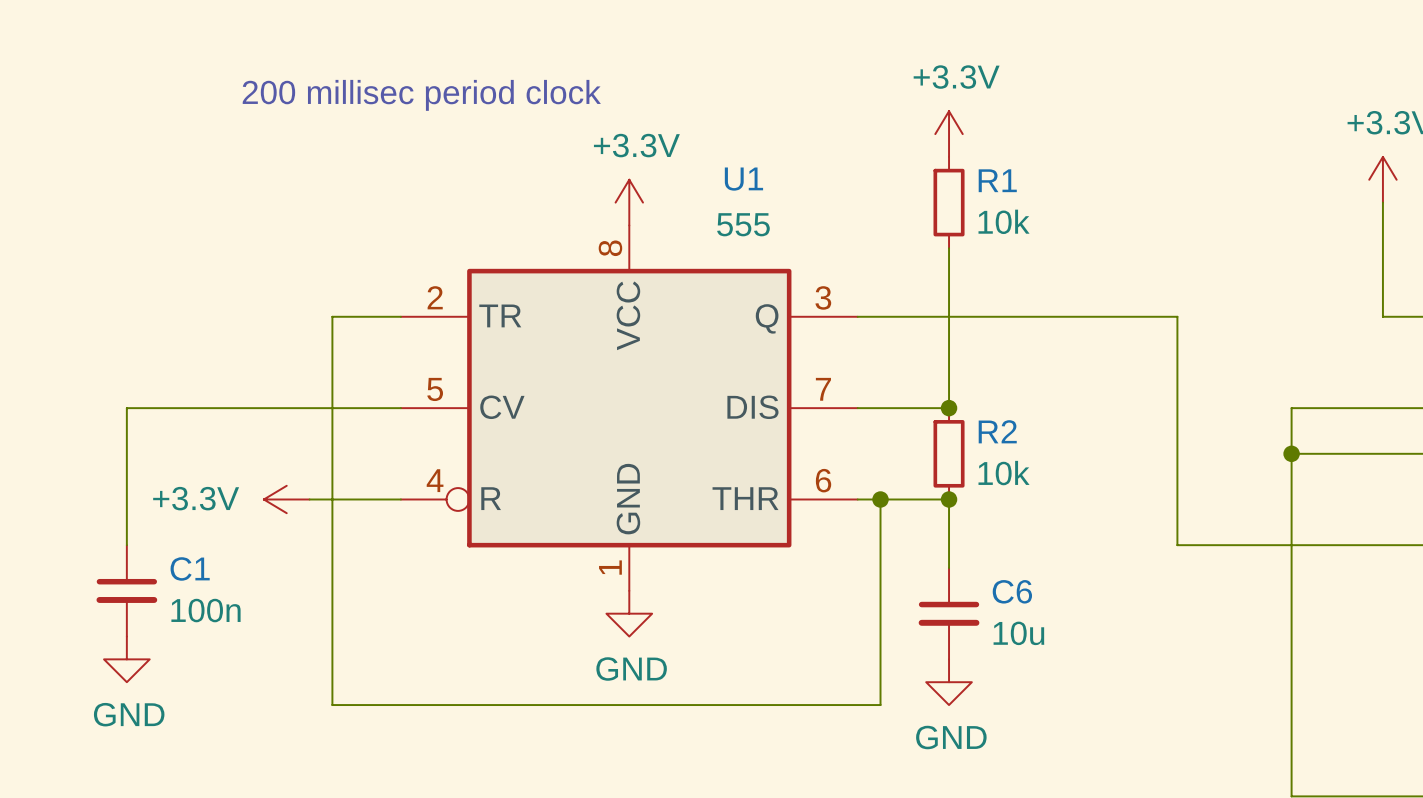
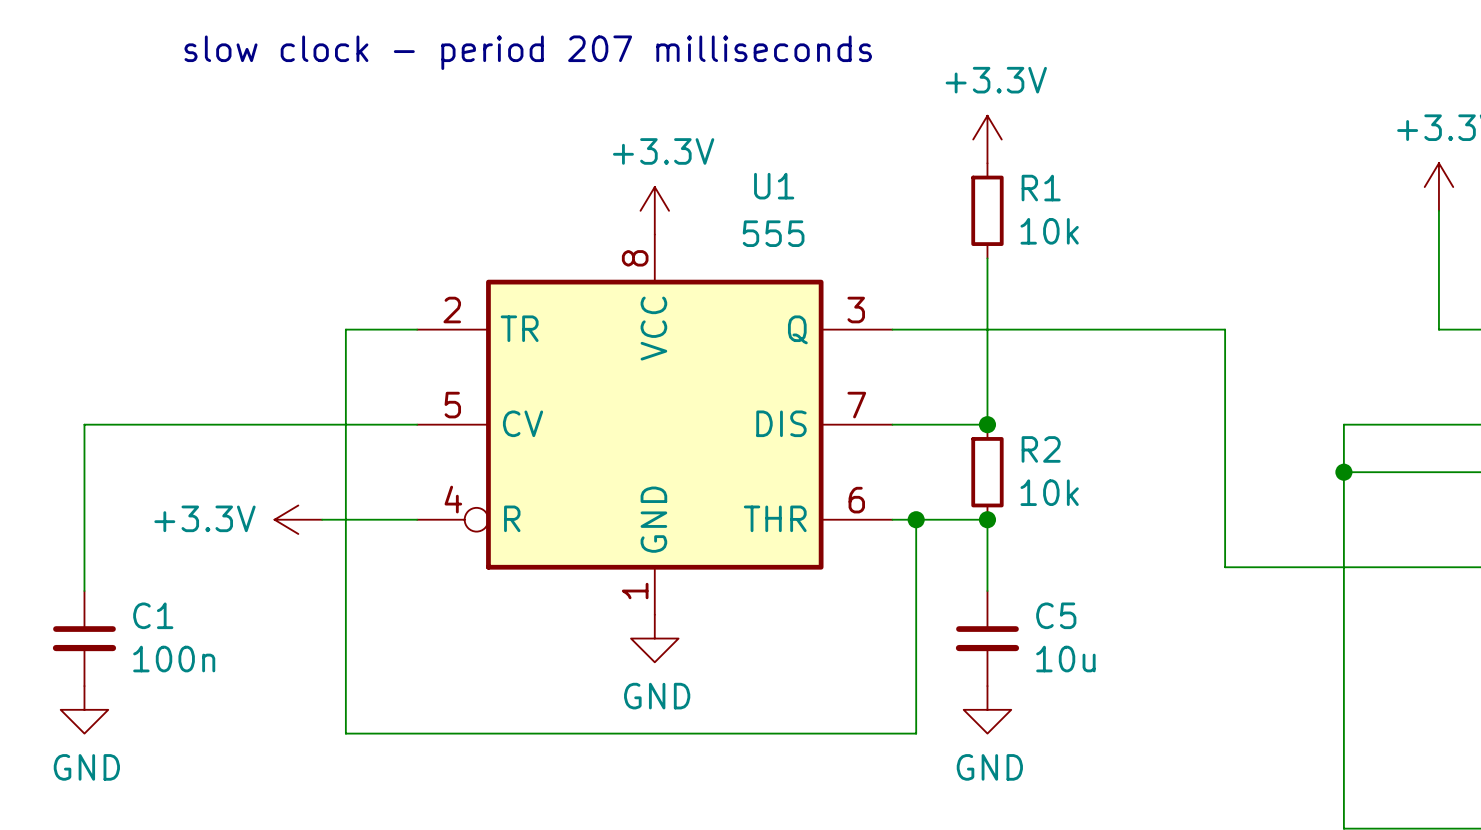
text: none -> slow clock - period 207 milliseconds (528, 52)
text: 200 millisec period clock (421, 95) -> none
wire: (126, 408) (126, 545) -> (132, 424) (84, 424) (84, 591)
C1 position: (126, 590) -> (84, 638)
C6 name: C6 (1012, 591) -> C5 (1056, 615)
power symbol position: GND (126, 659) -> GND (84, 709)

